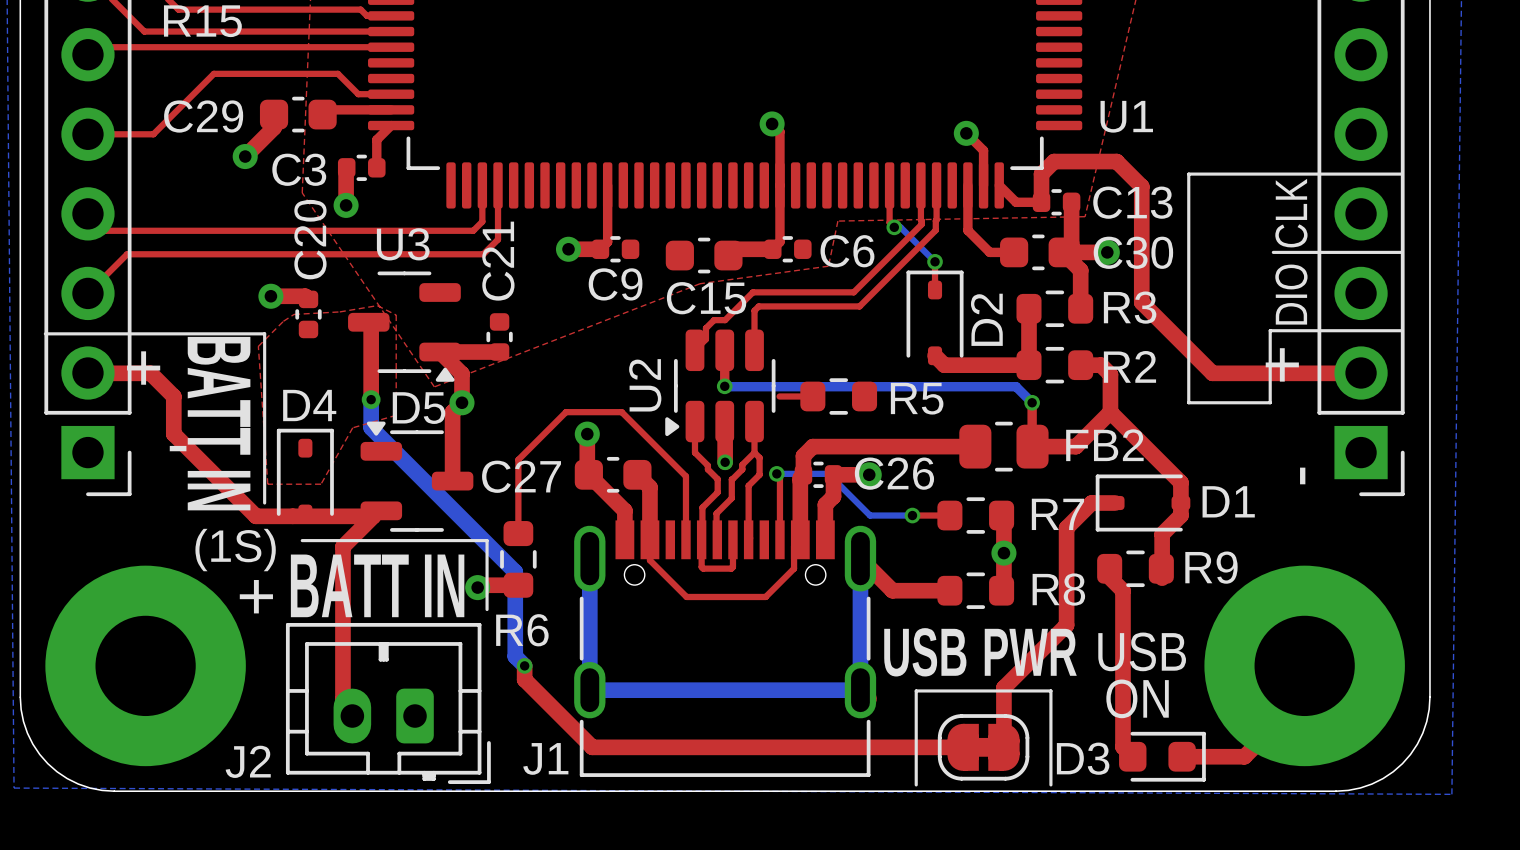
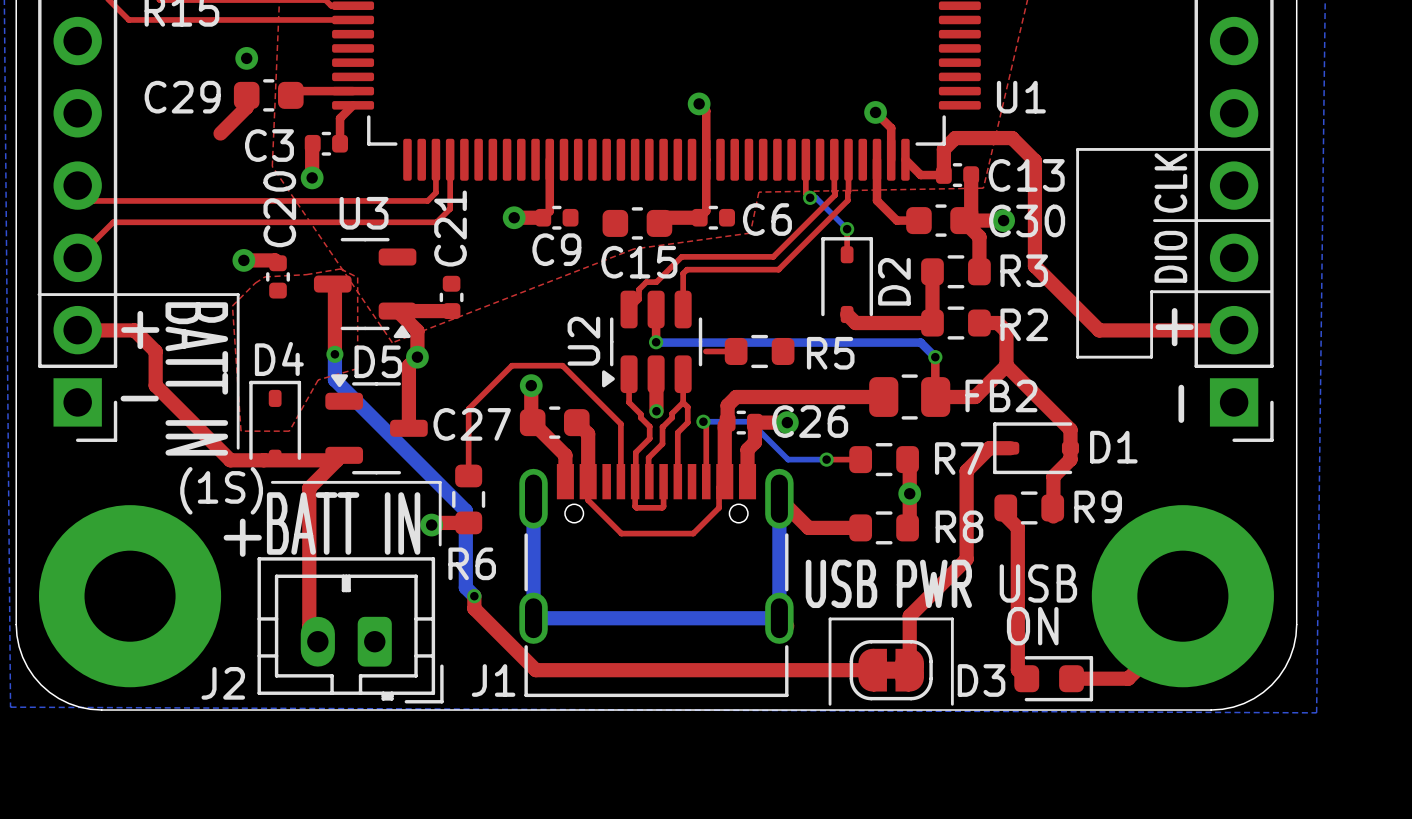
top track: (391, 47) (95, 47) (87, 54) -> none
top track: (391, 94) (358, 94) (337, 73) (213, 73) (153, 134) (87, 134) -> none
via position: (245, 156) -> (246, 58)

